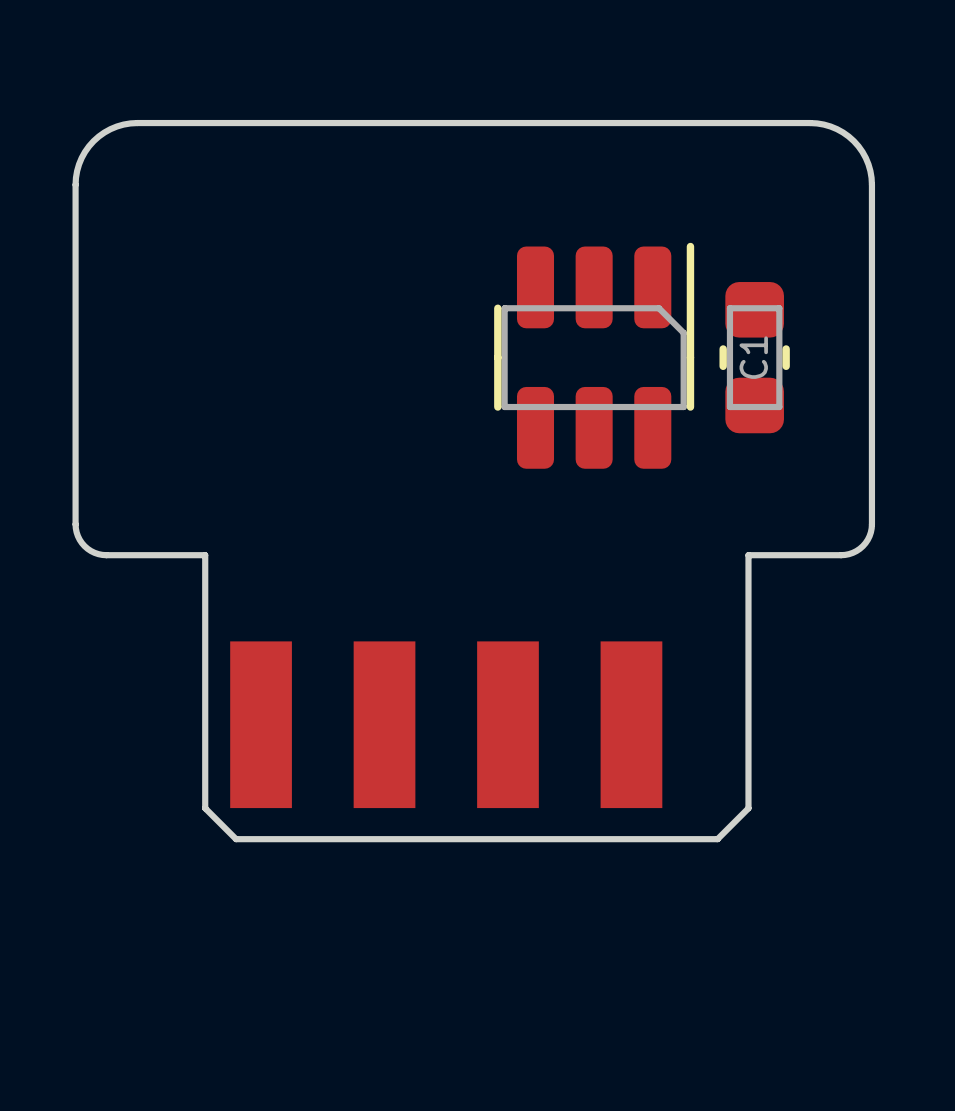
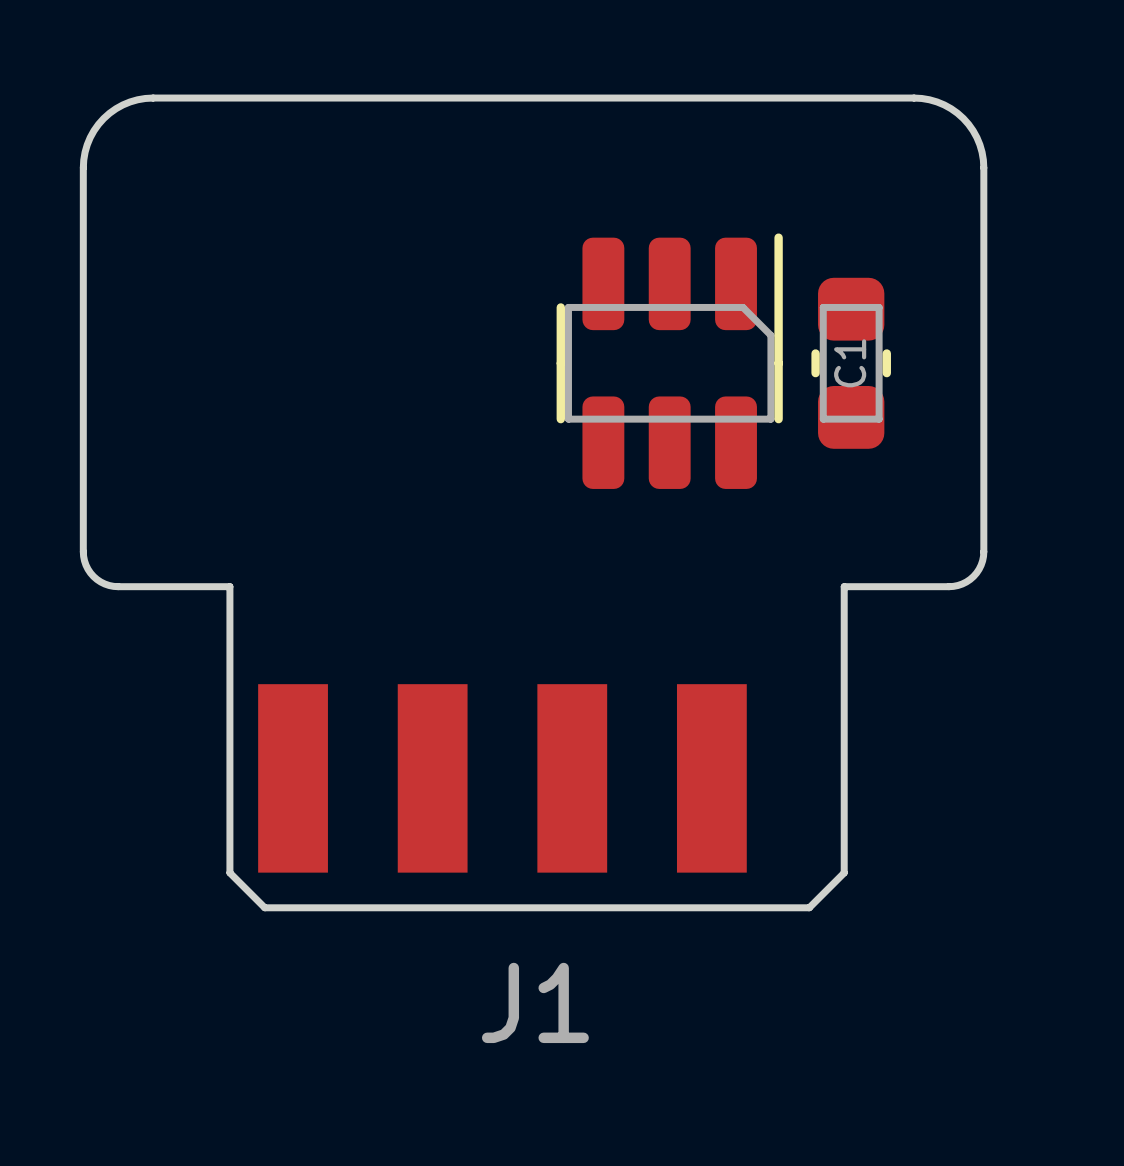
J1 name: none -> J1 (535, 1002)

